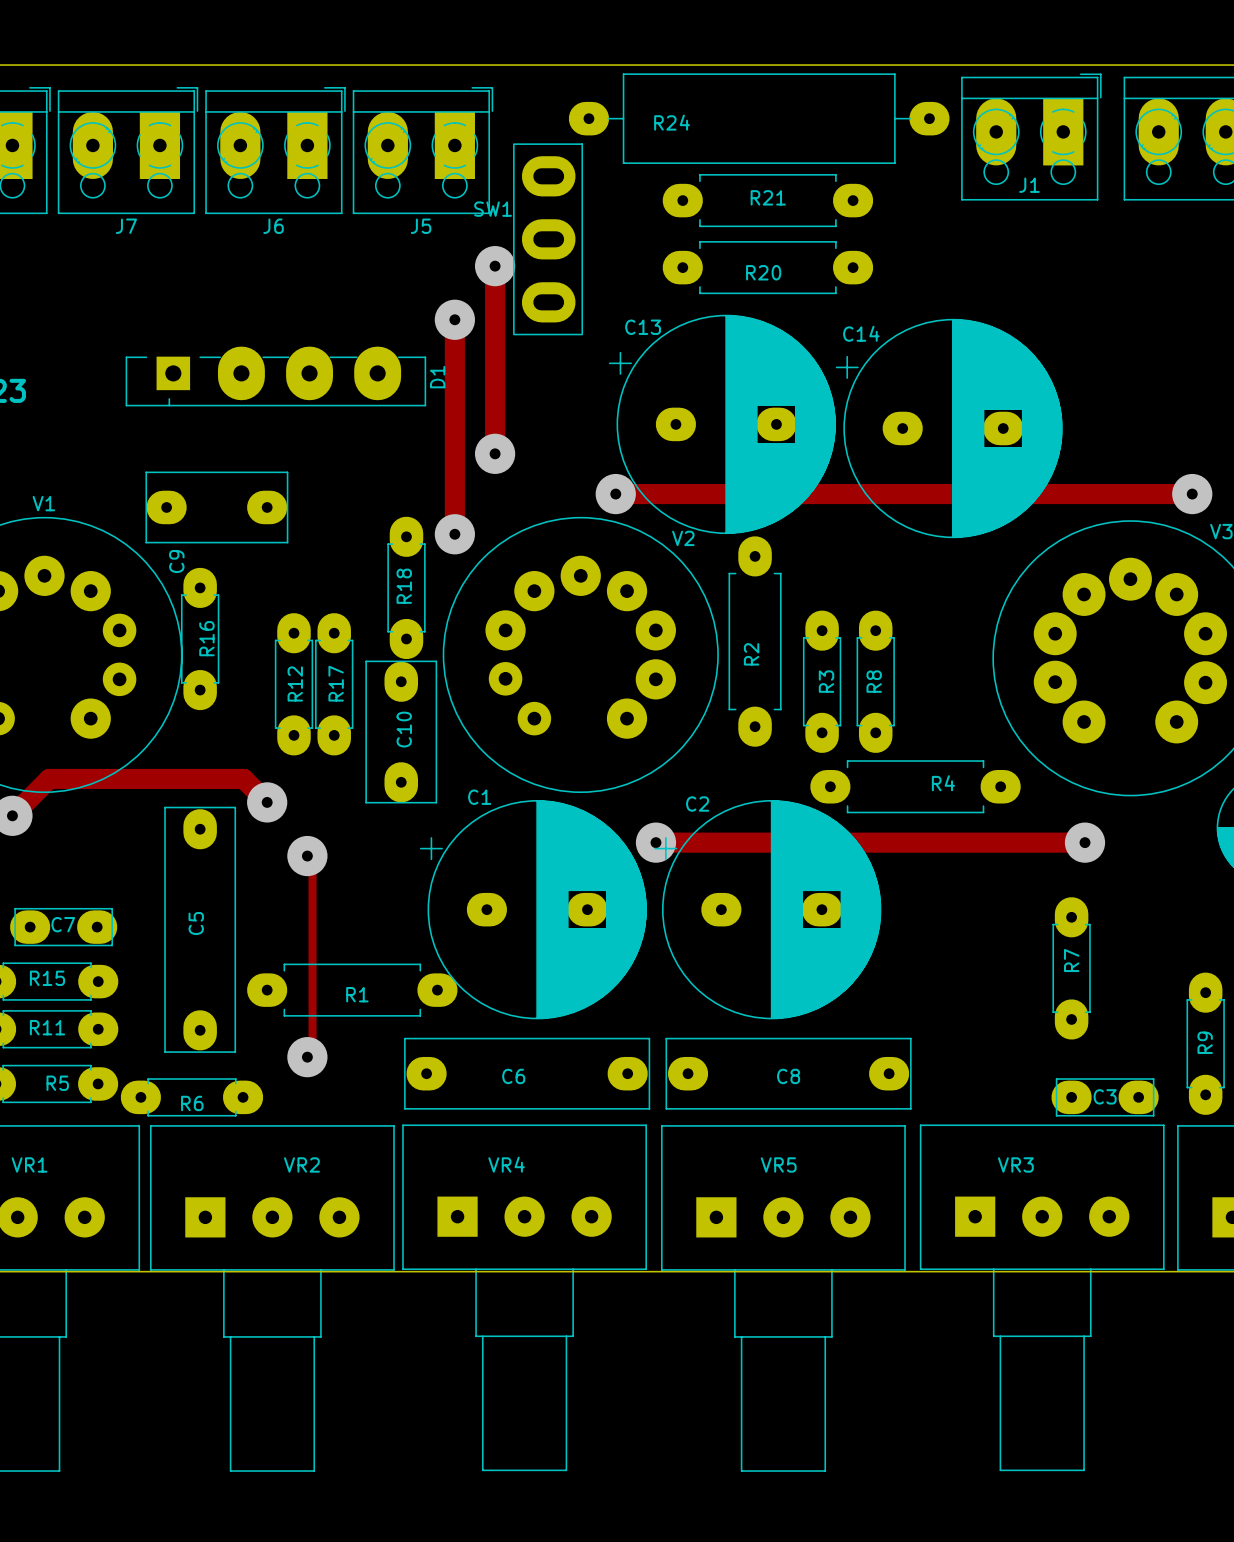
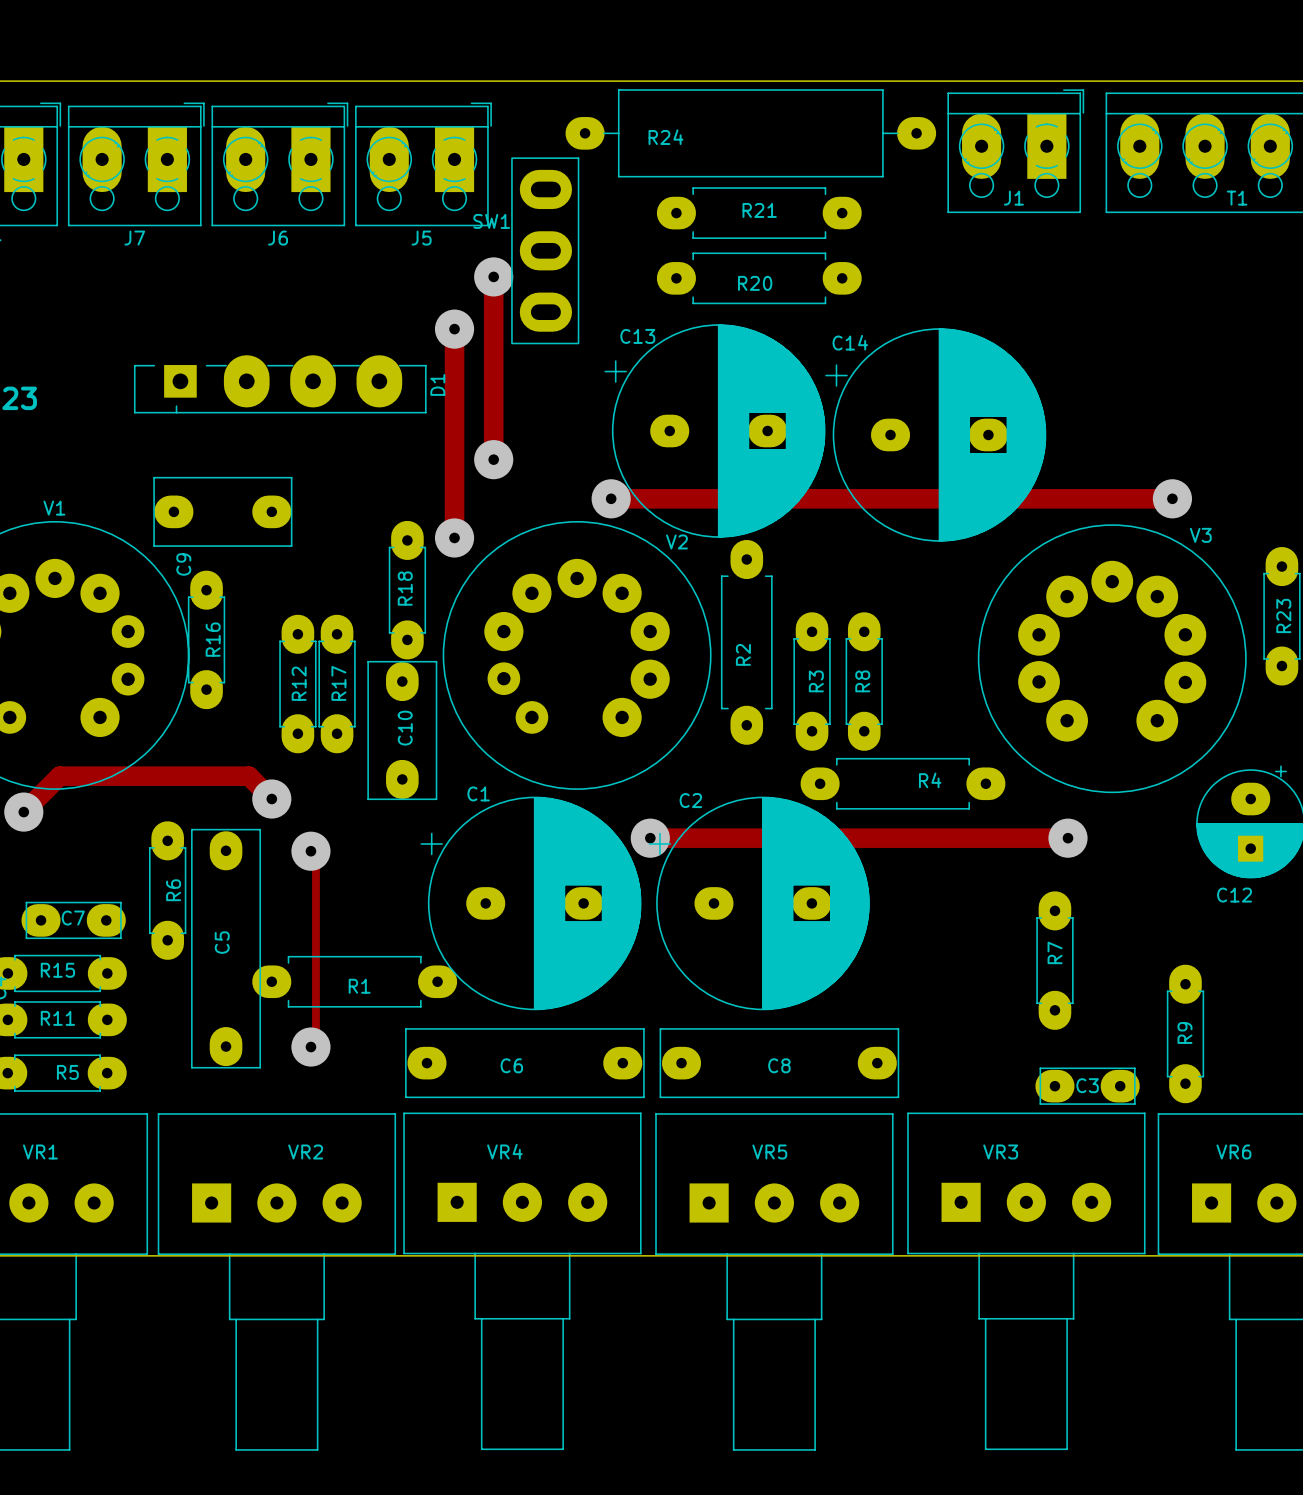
C5 position: (200, 929) -> (226, 948)
R6 rotation: 0° (191, 1097) -> 90° clockwise (167, 890)
R6 position: (191, 1097) -> (167, 890)

